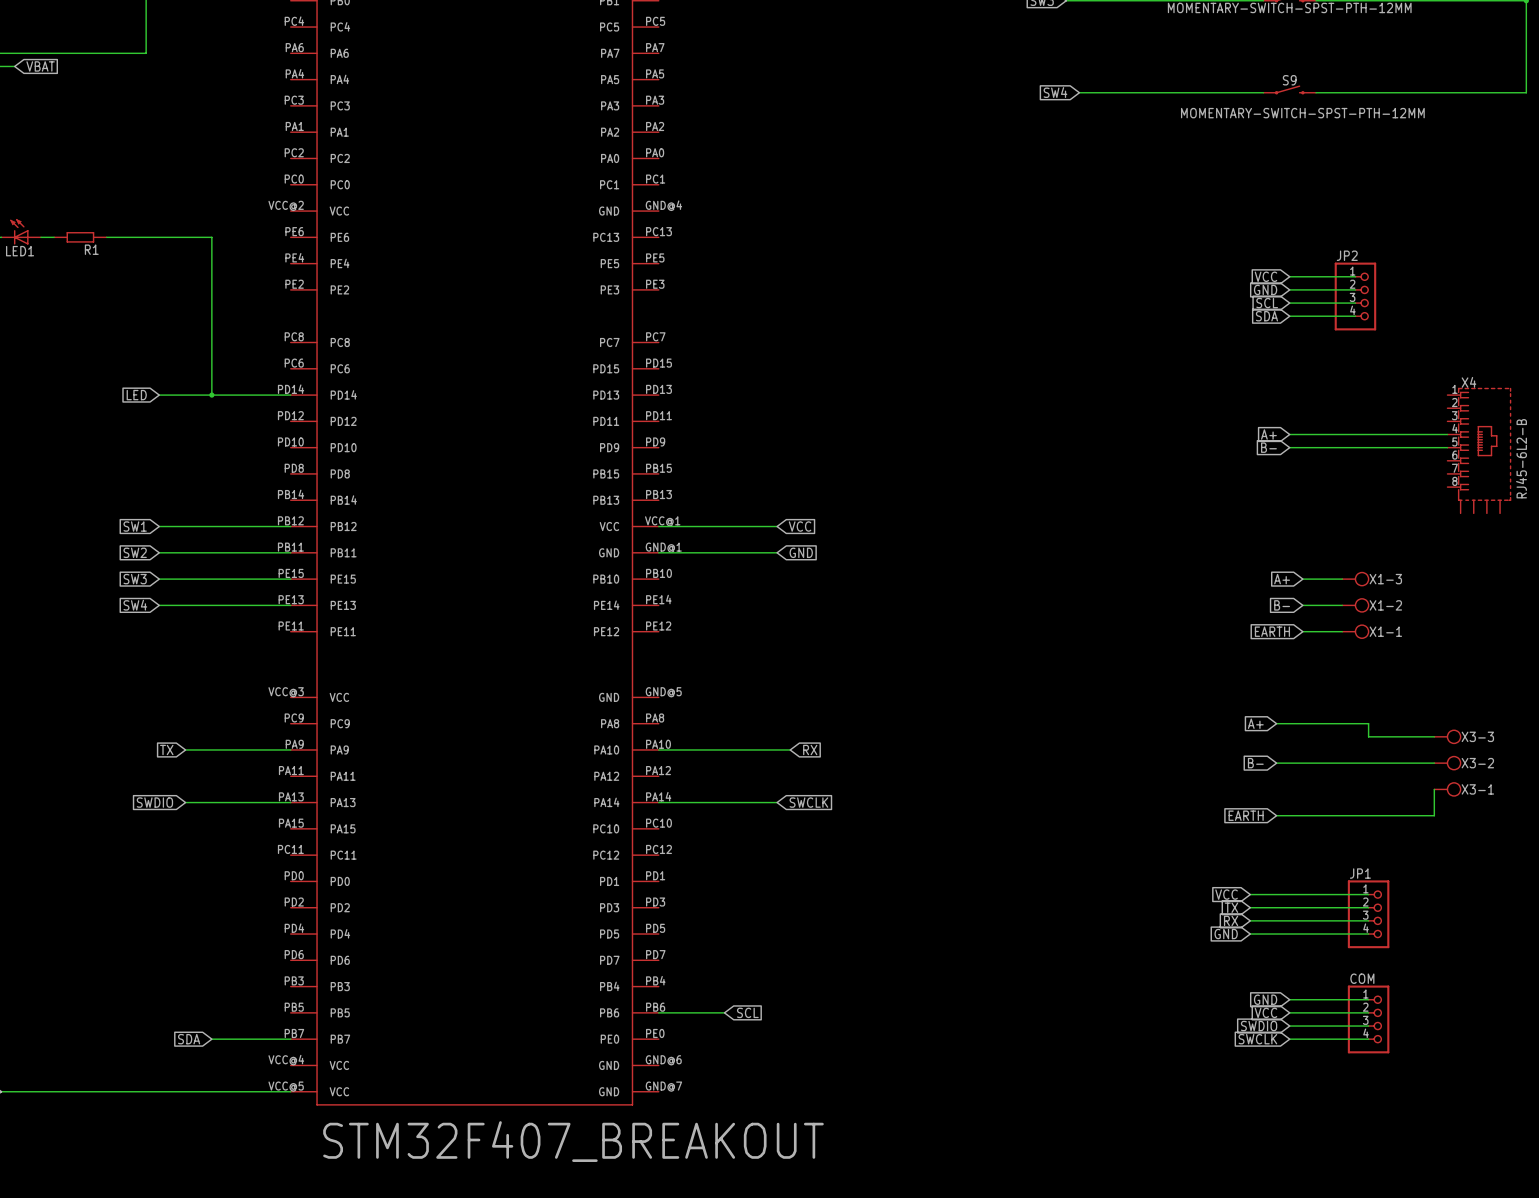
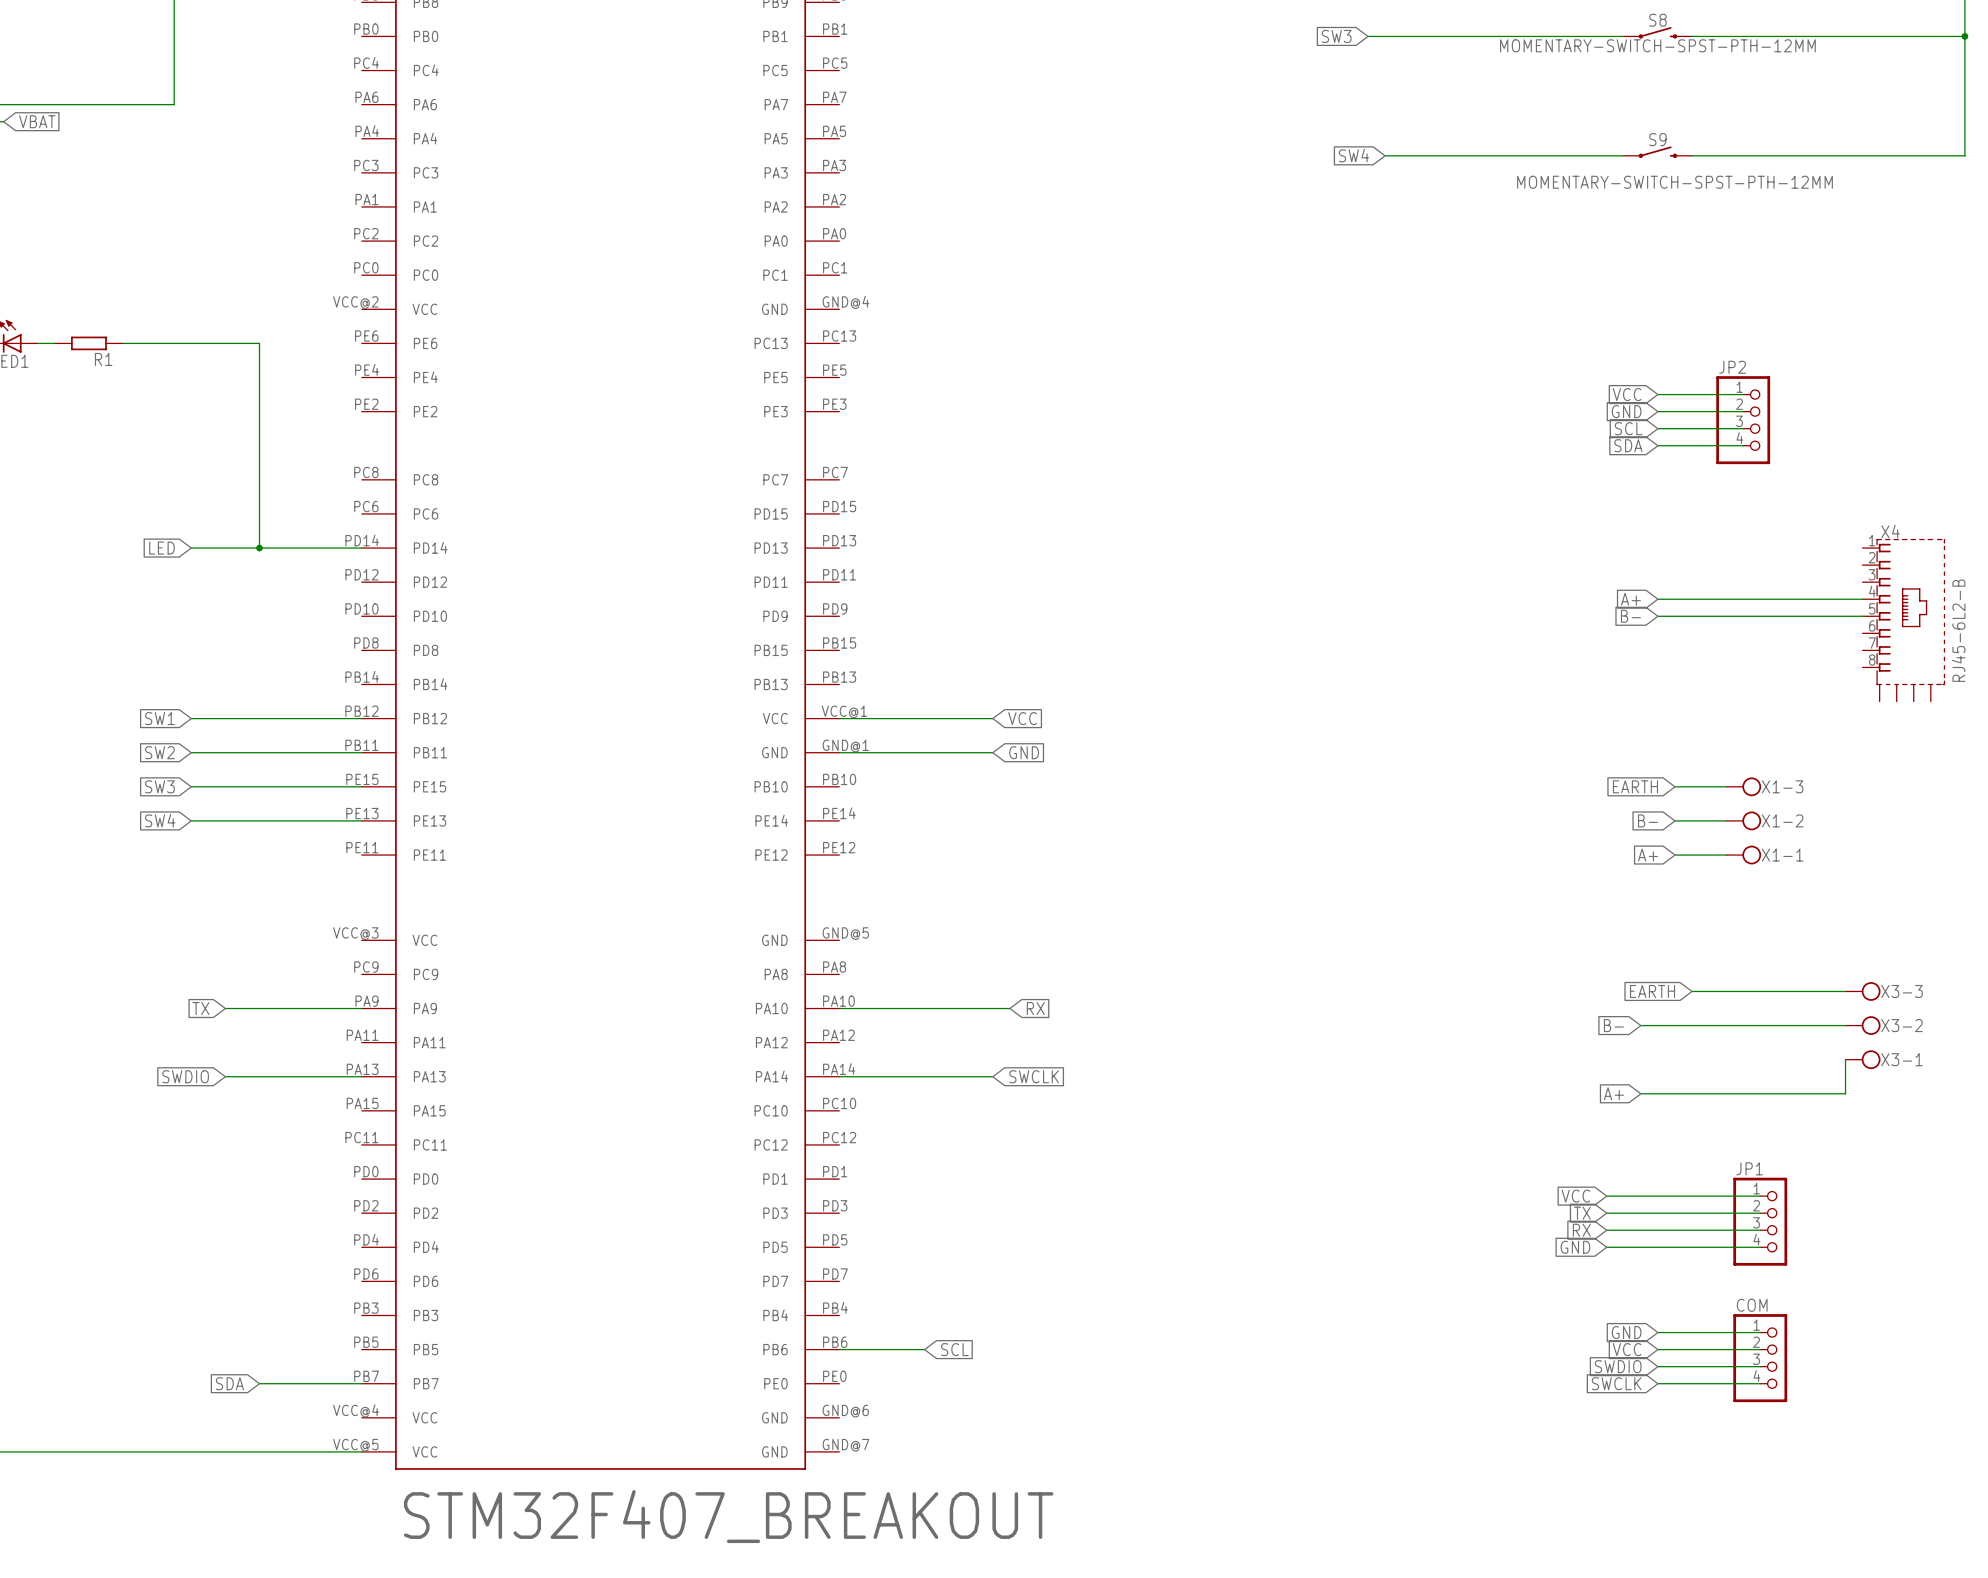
global label: A+ (1282, 579) -> EARTH (1635, 786)
global label: EARTH (1272, 631) -> A+ (1648, 855)
global label: A+ (1255, 723) -> none
wire: (1276, 723) (1368, 723) (1368, 736) -> (1692, 991) (1760, 991)
global label: none -> EARTH (1652, 991)
global label: EARTH (1246, 815) -> A+ (1613, 1093)

